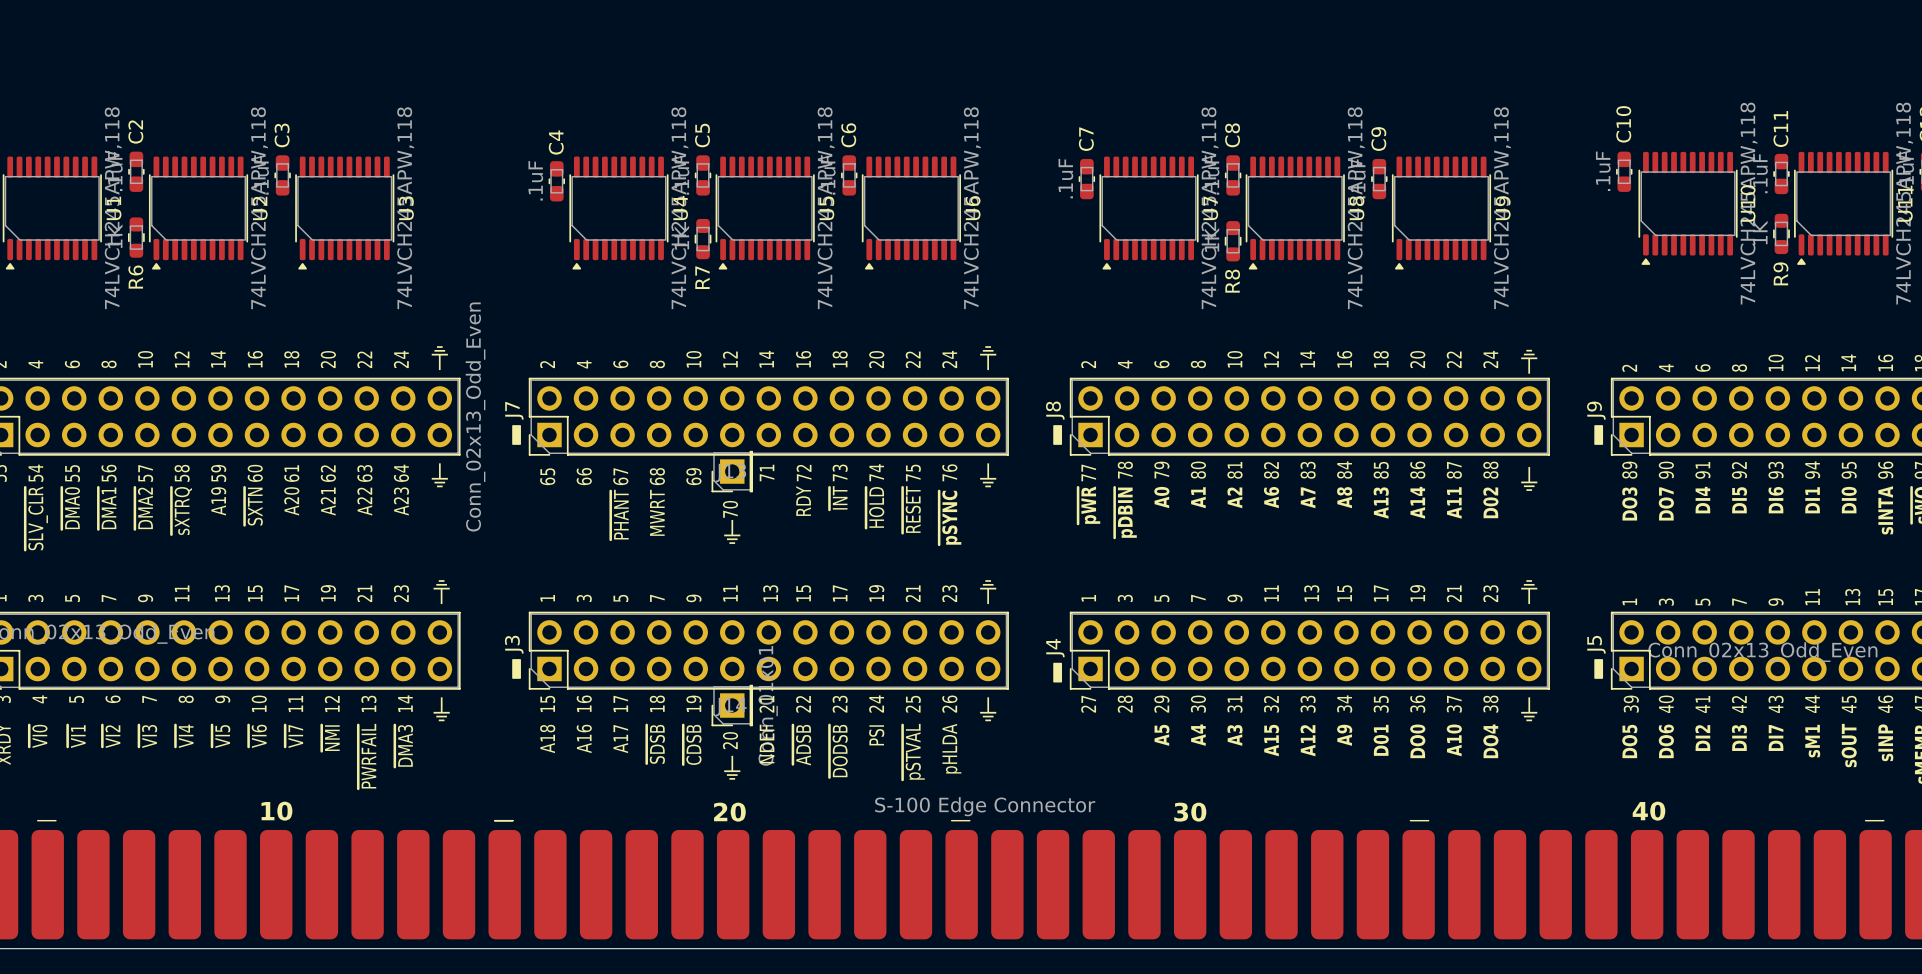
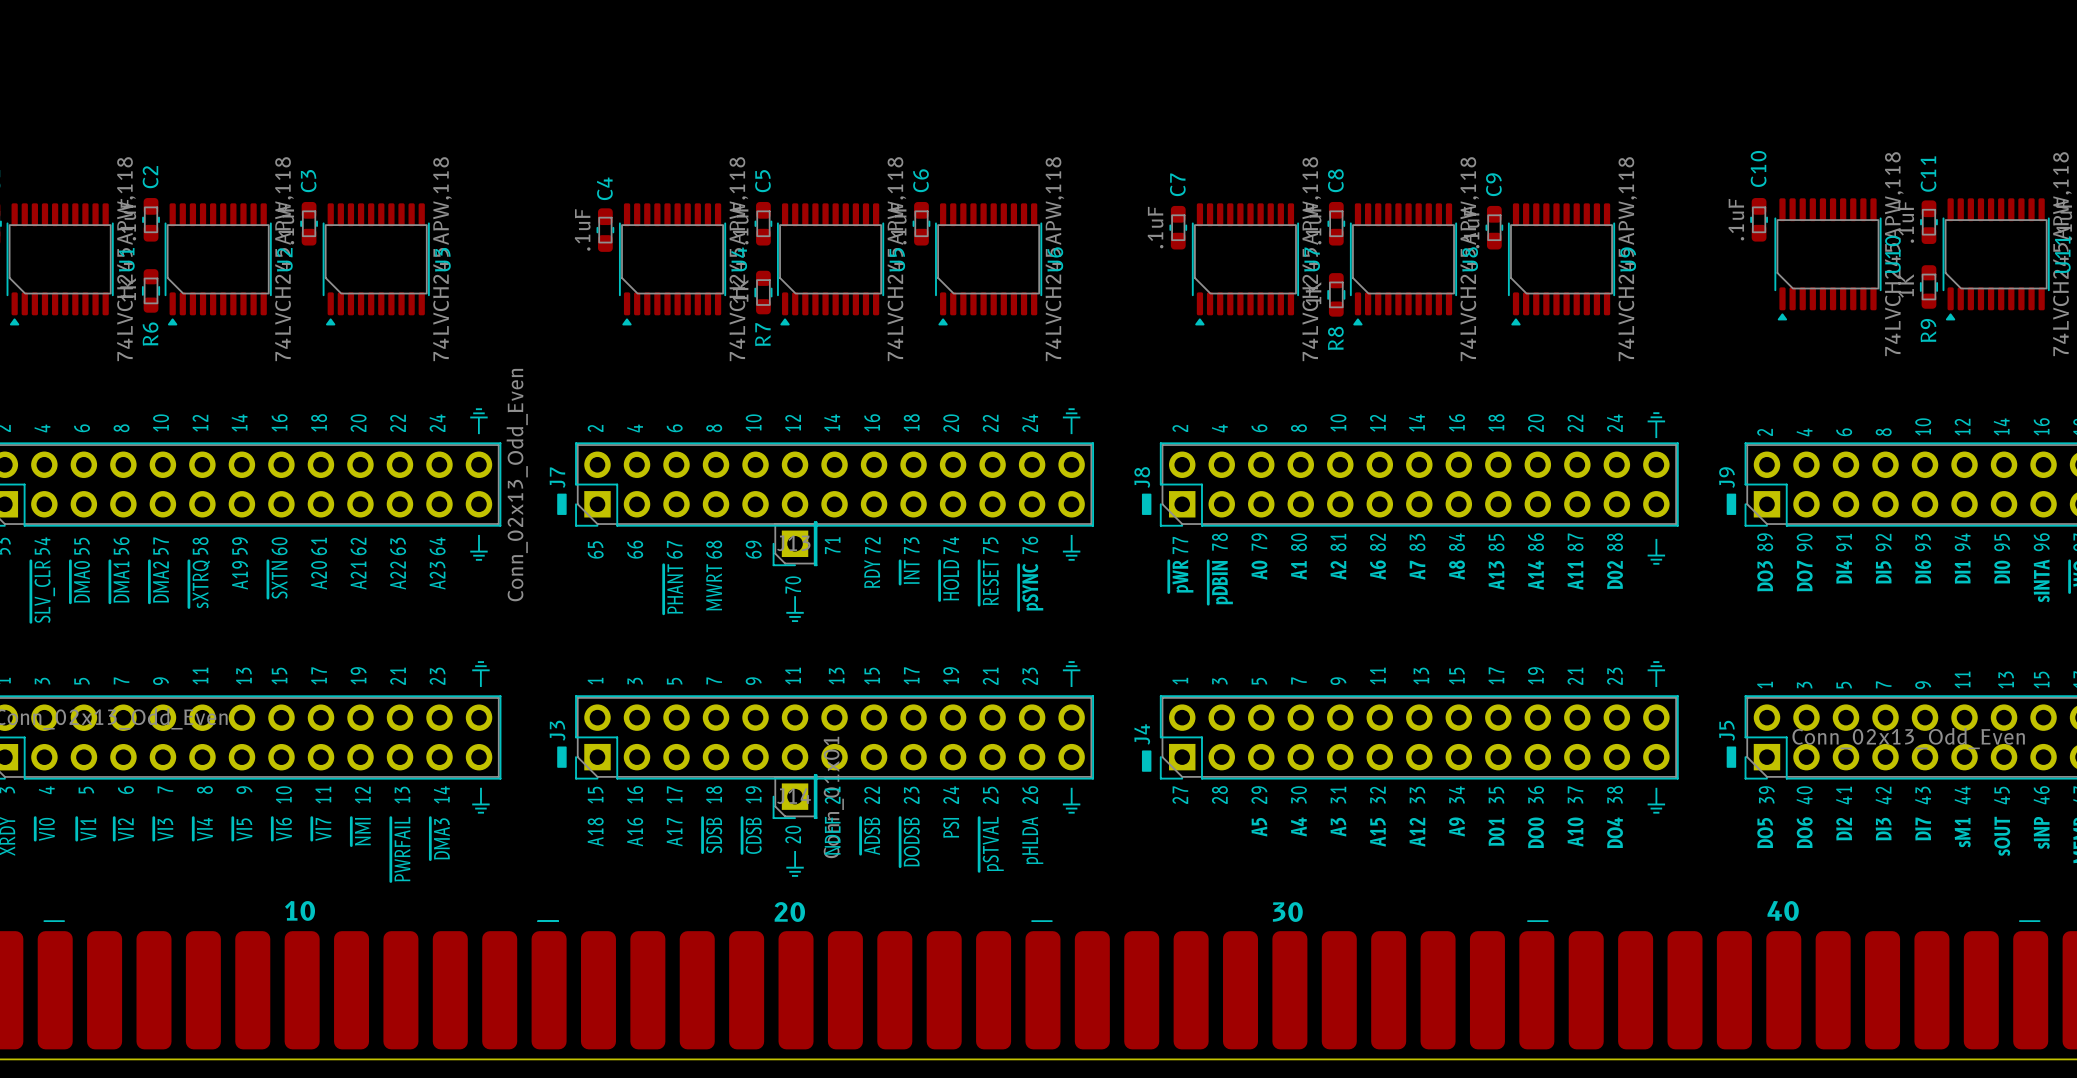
part value: S-100 Edge Connector (985, 806) -> none

